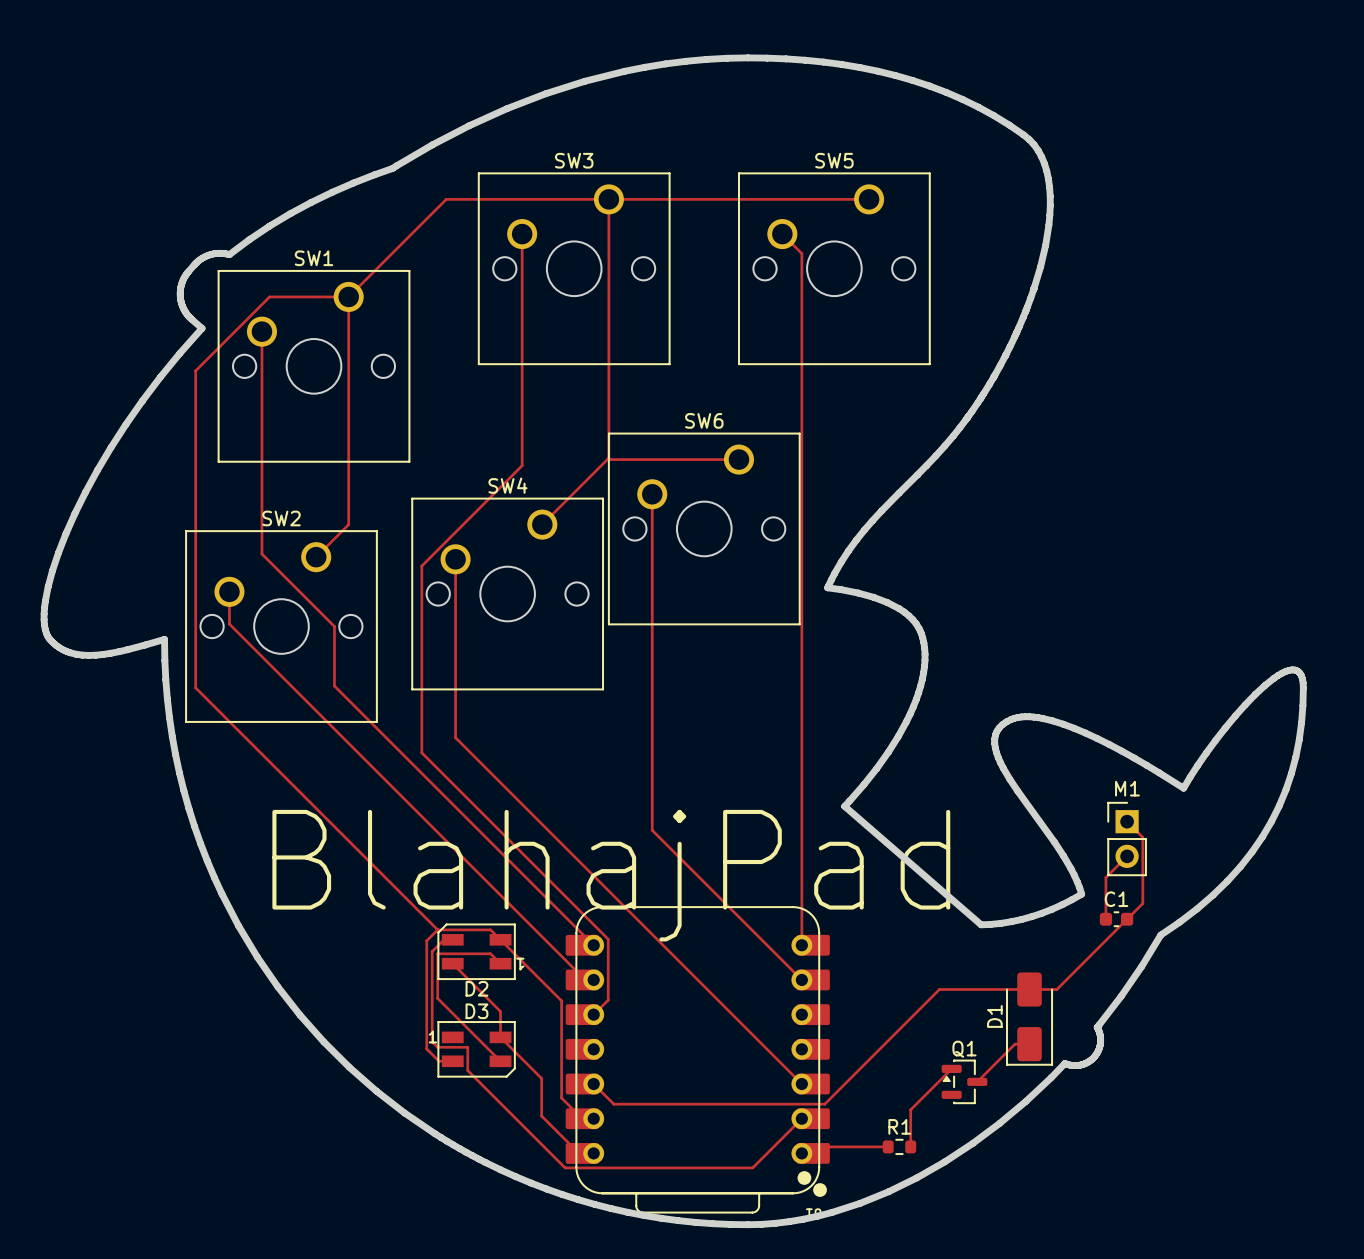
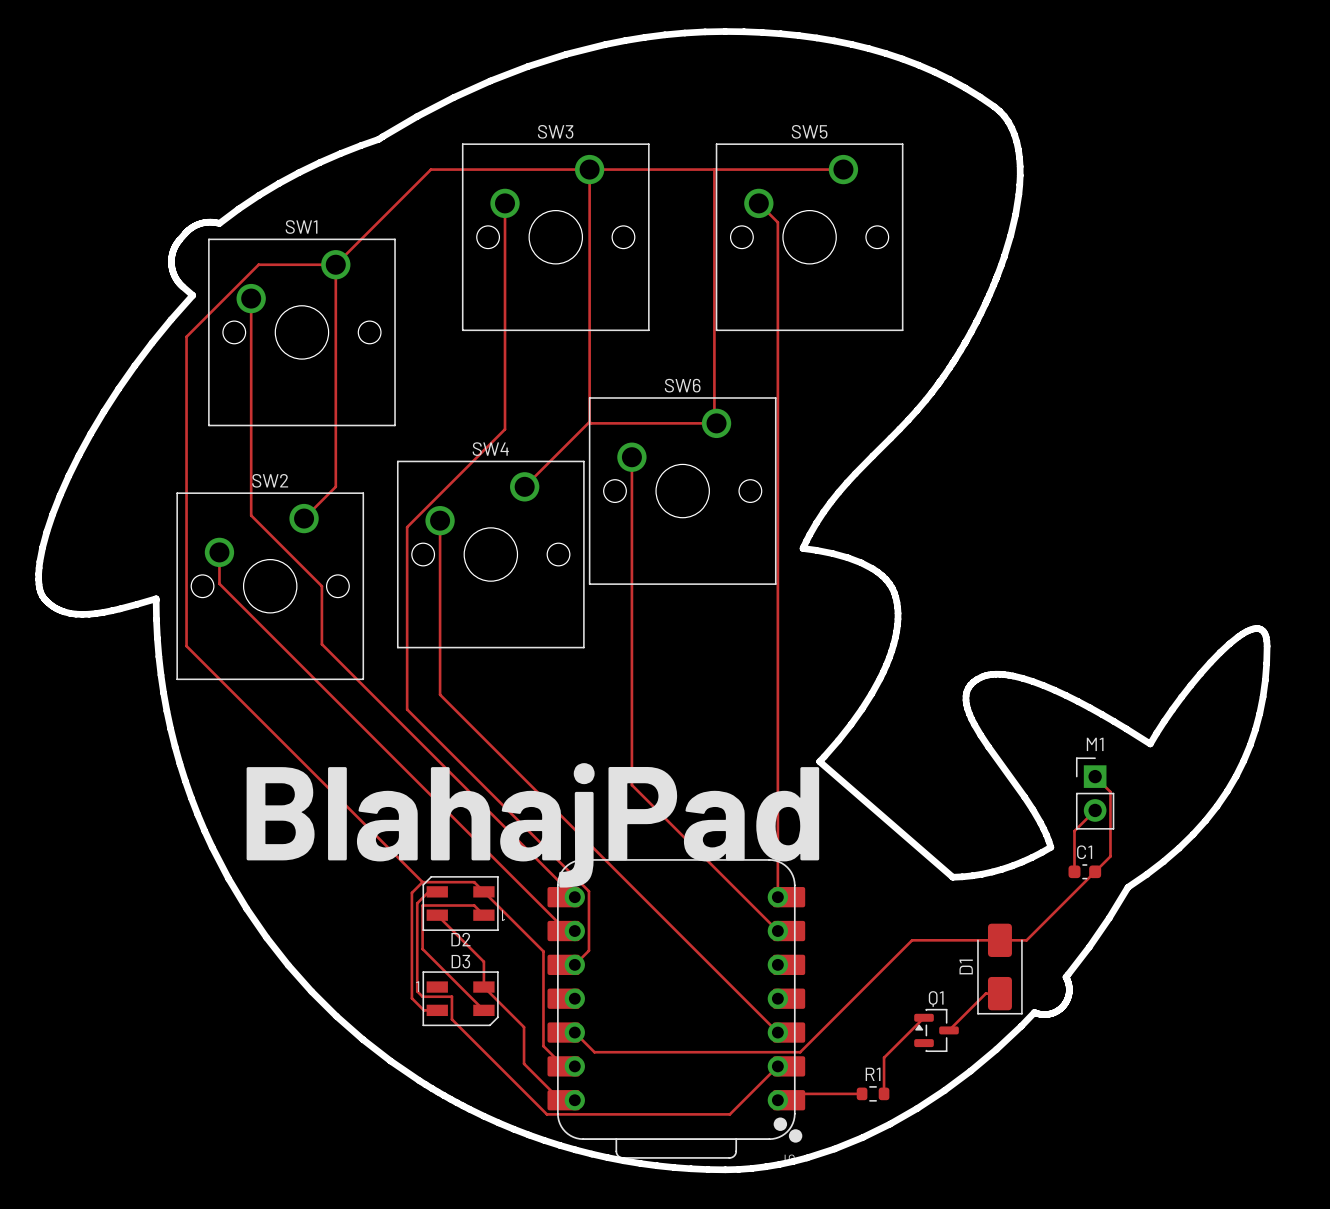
top track: none -> (714, 169) (714, 421) (716, 423)

